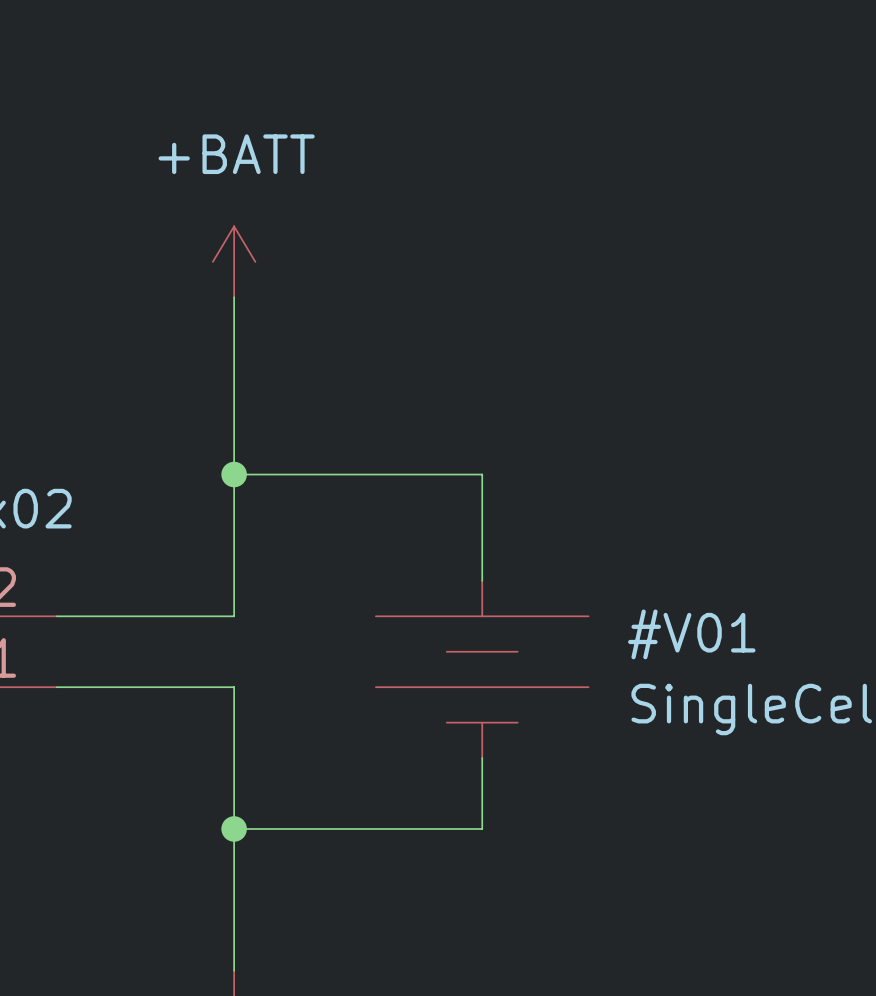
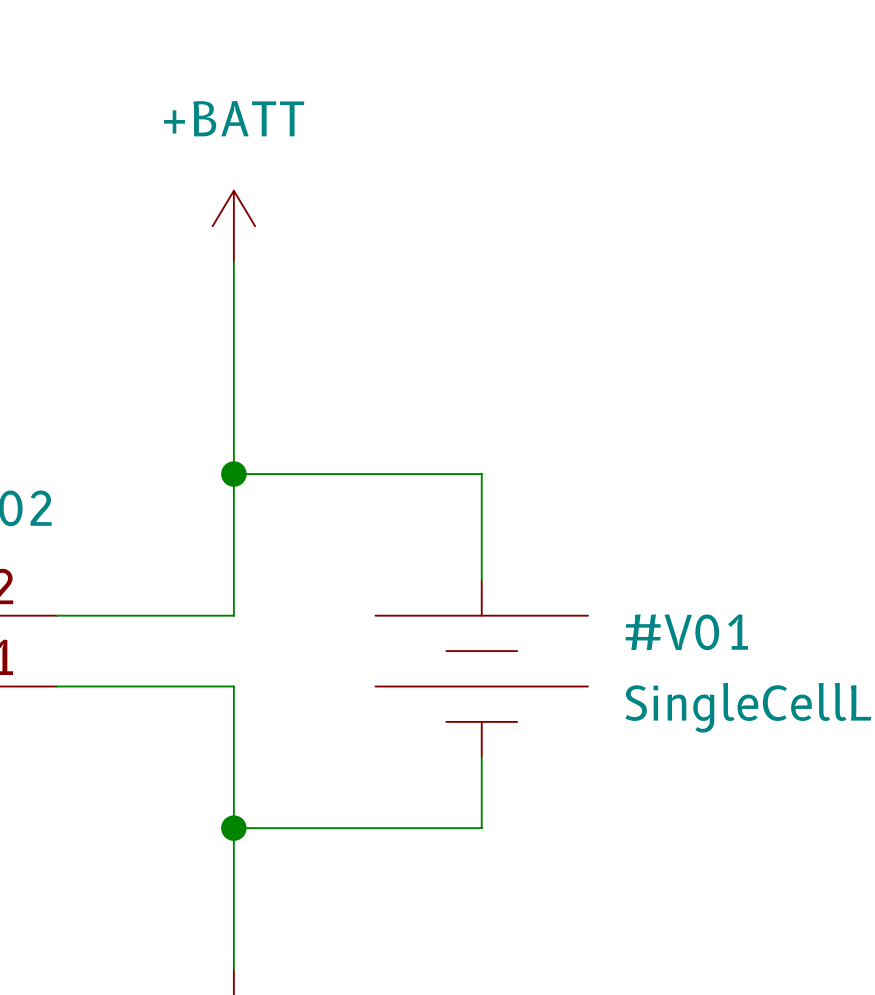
power symbol position: +BATT (234, 261) -> +BATT (233, 226)

